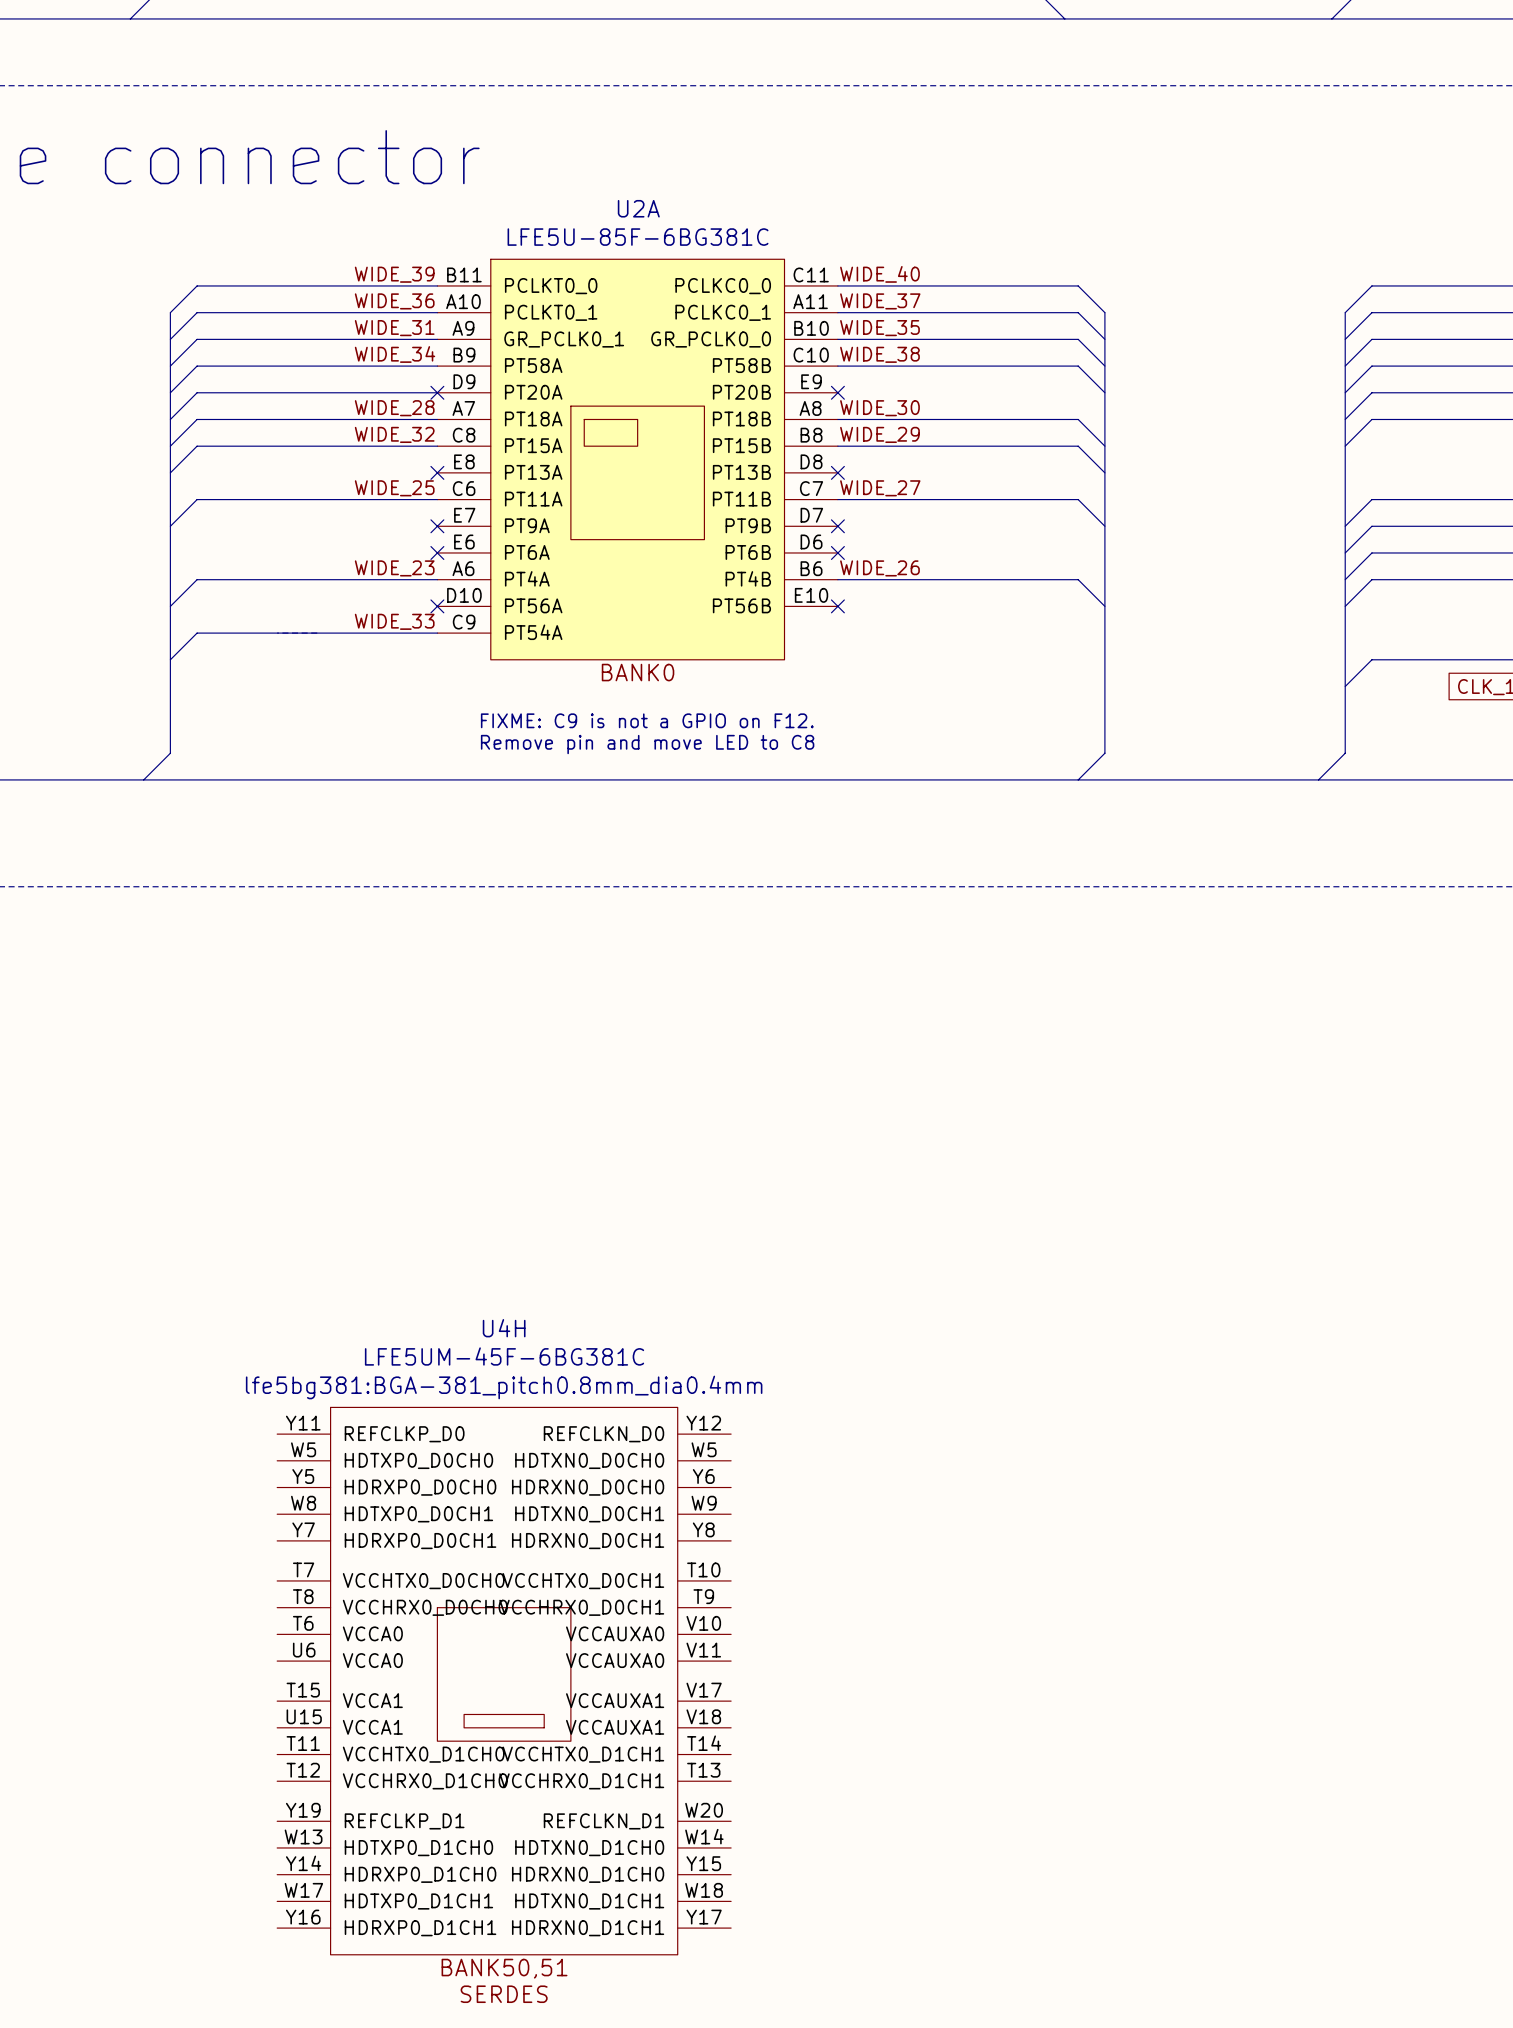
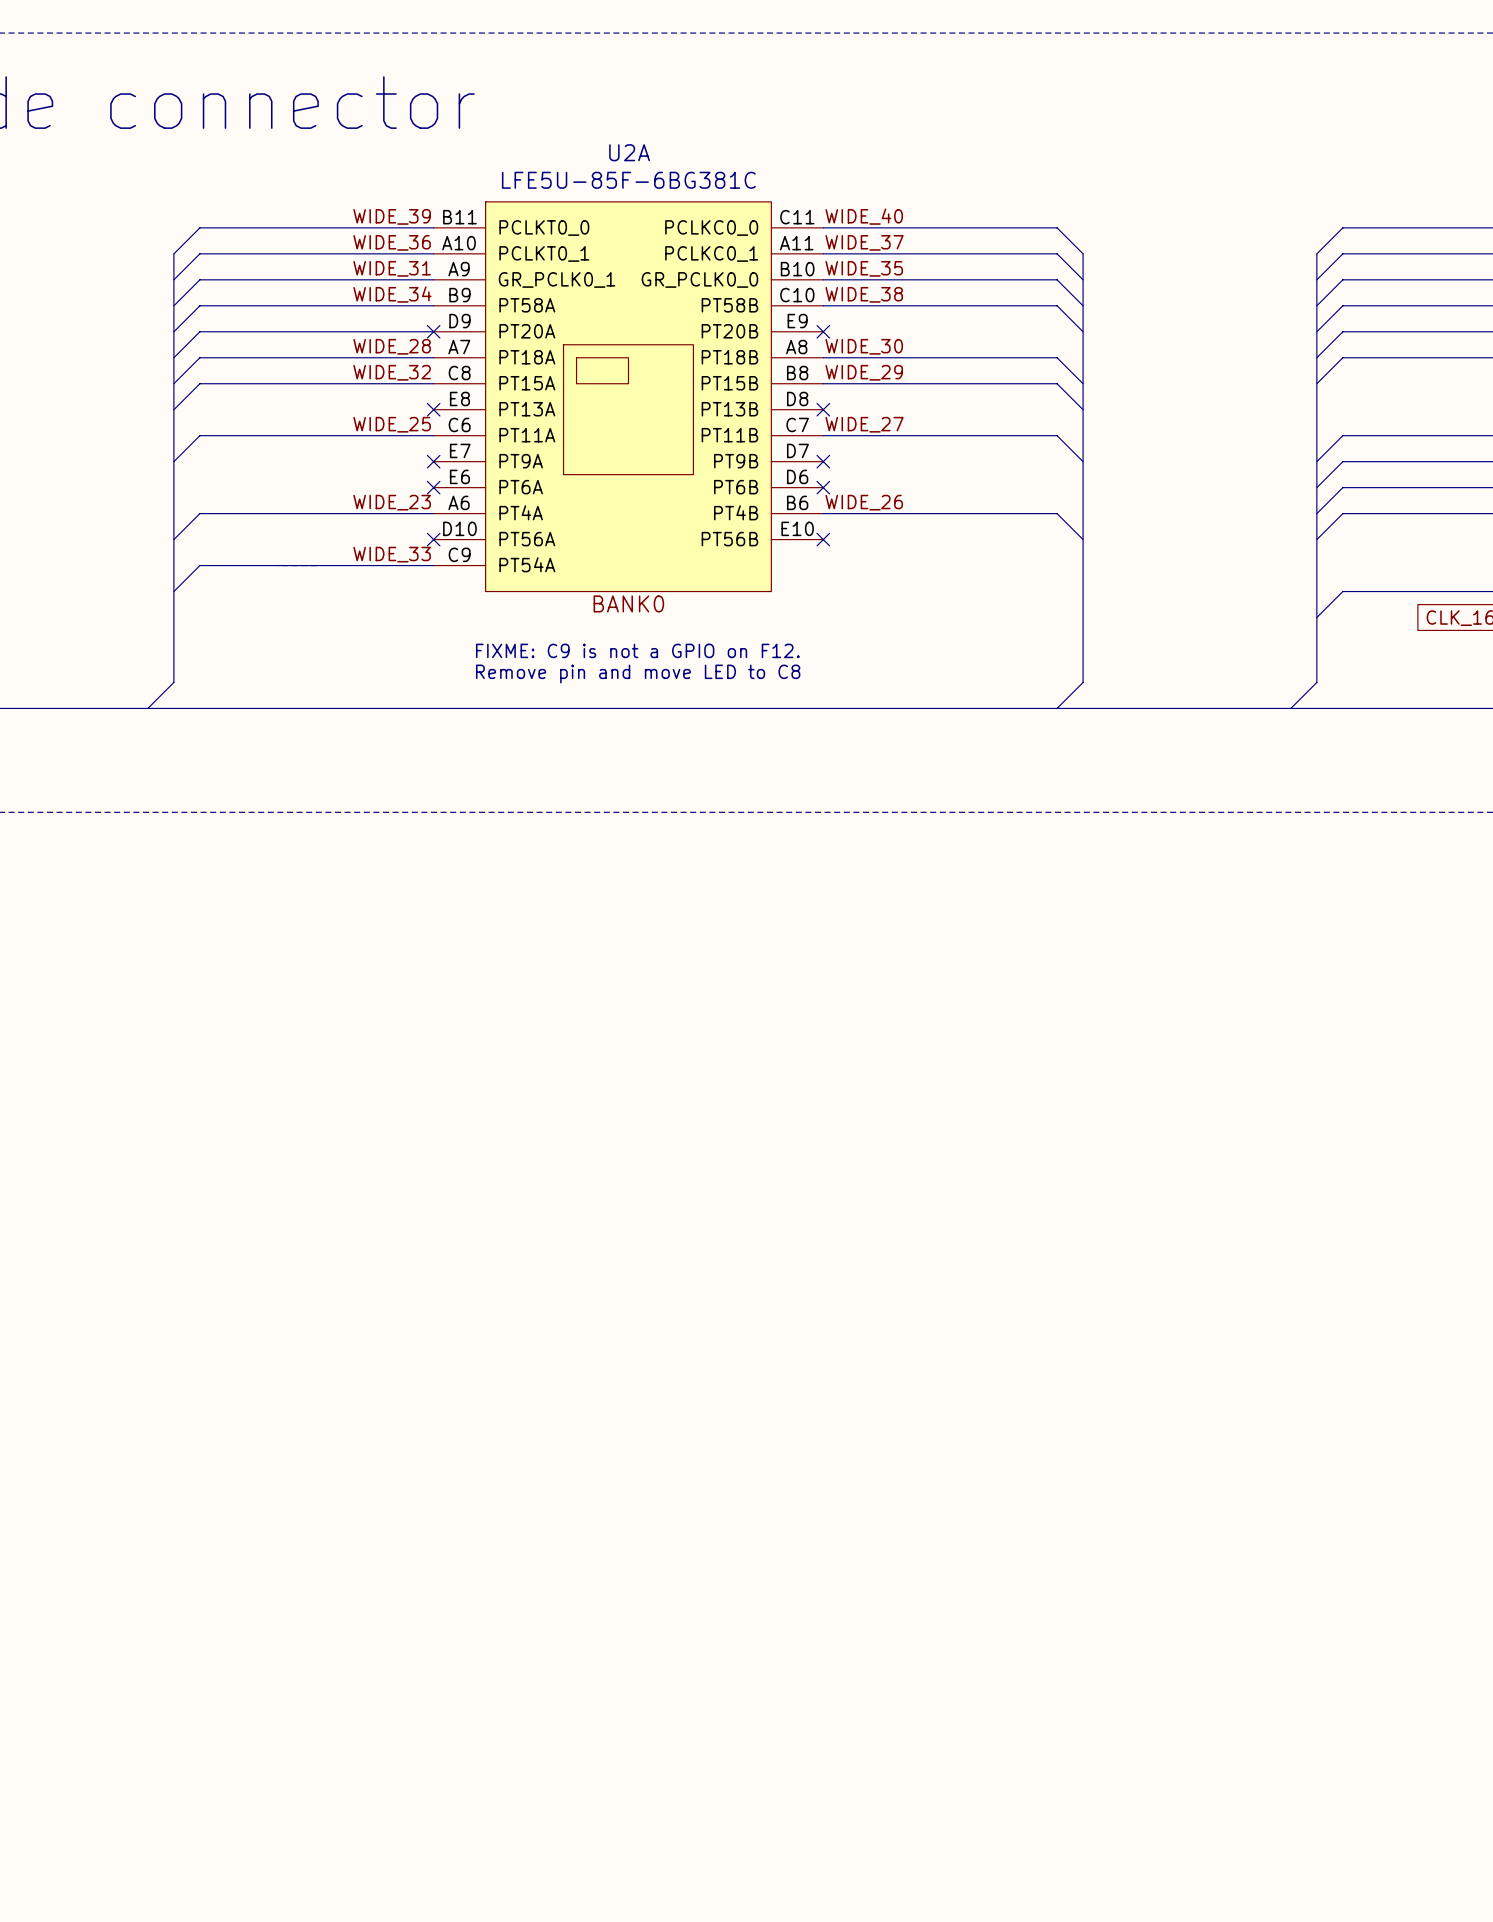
U4H: LFE5UM-45F-6BG381C (504, 1681) -> none

